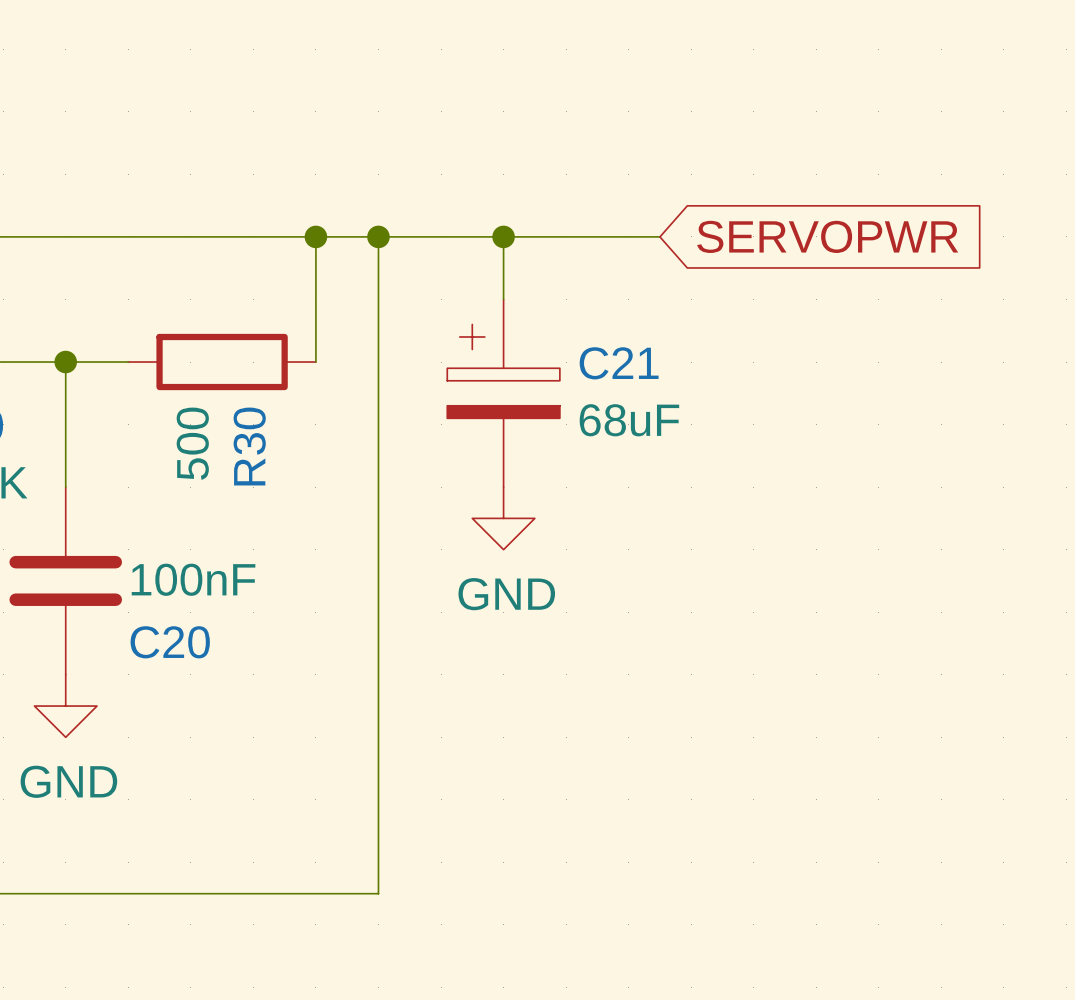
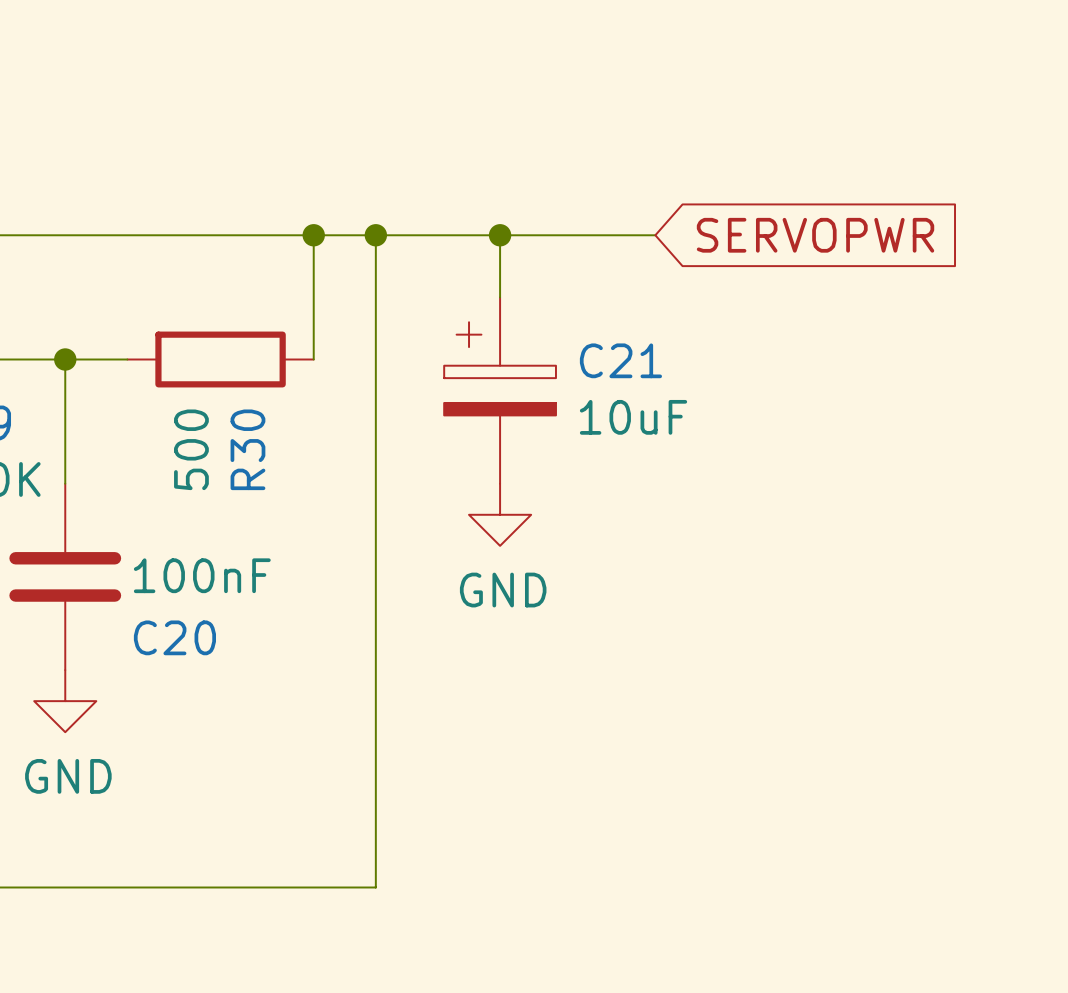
C21 value: 68uF (629, 420) -> 10uF (633, 417)

